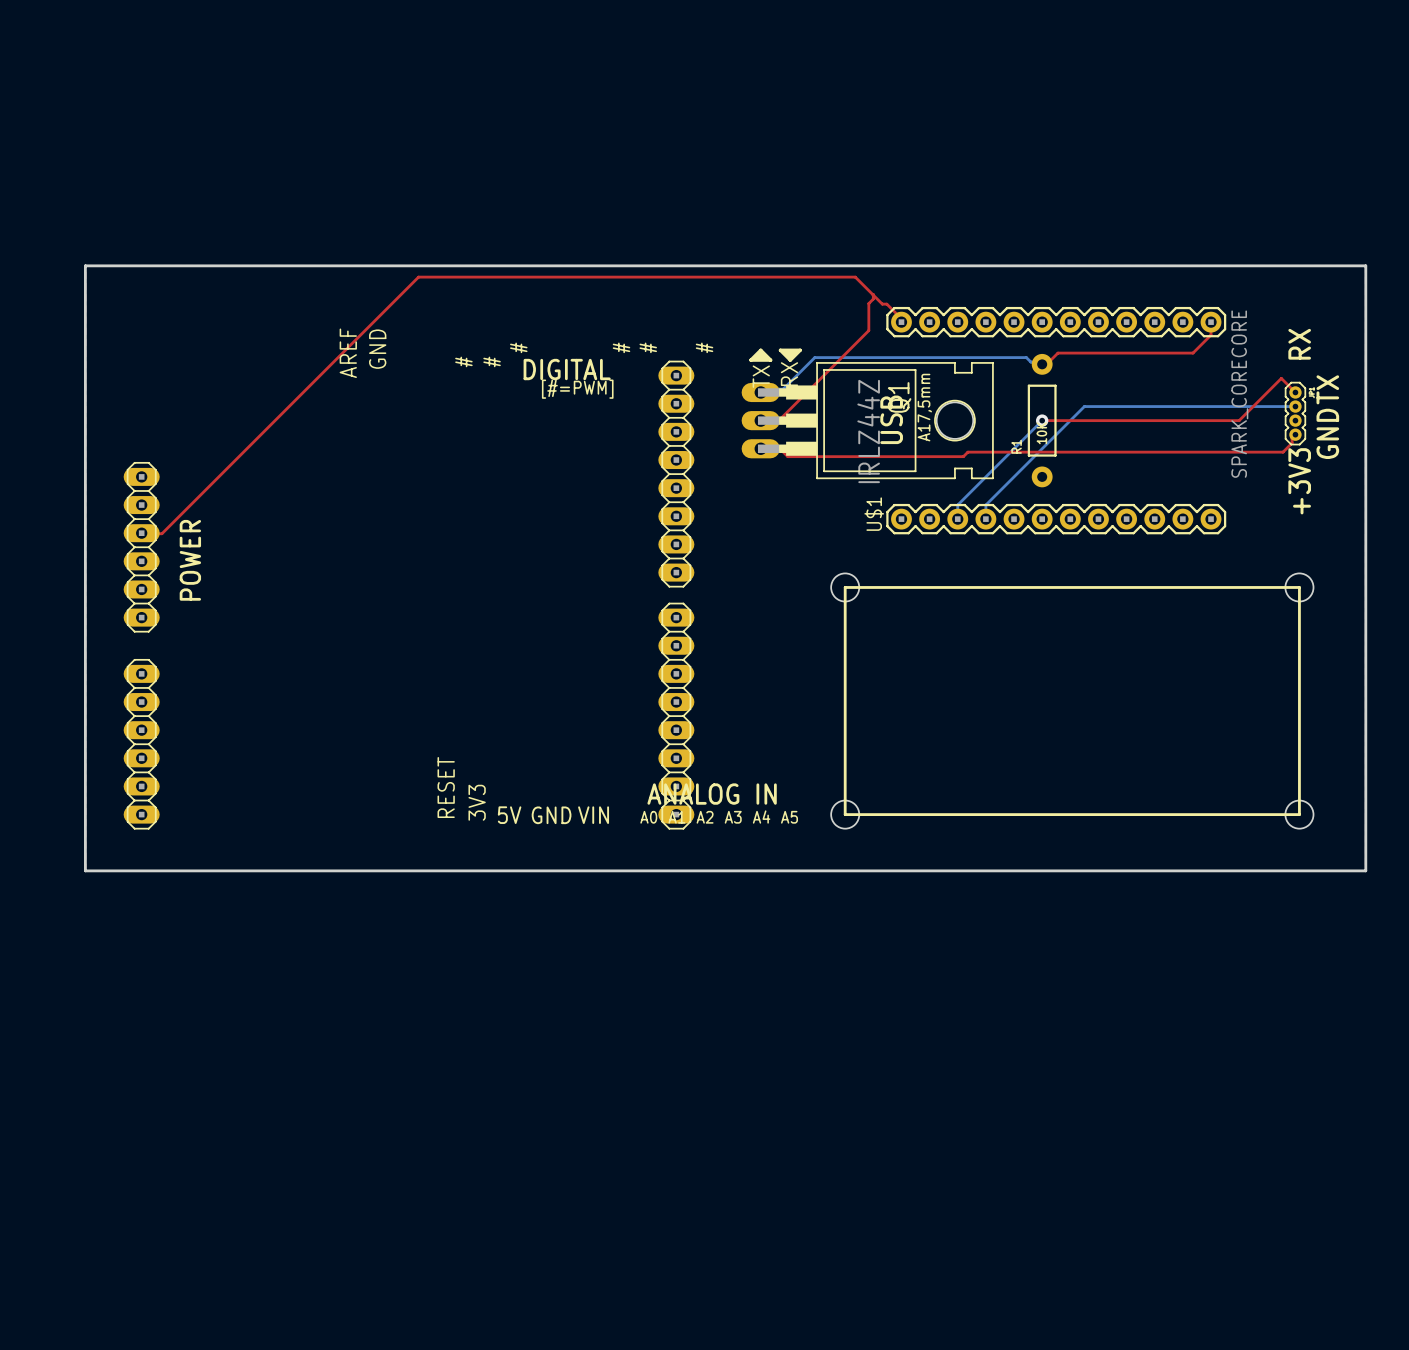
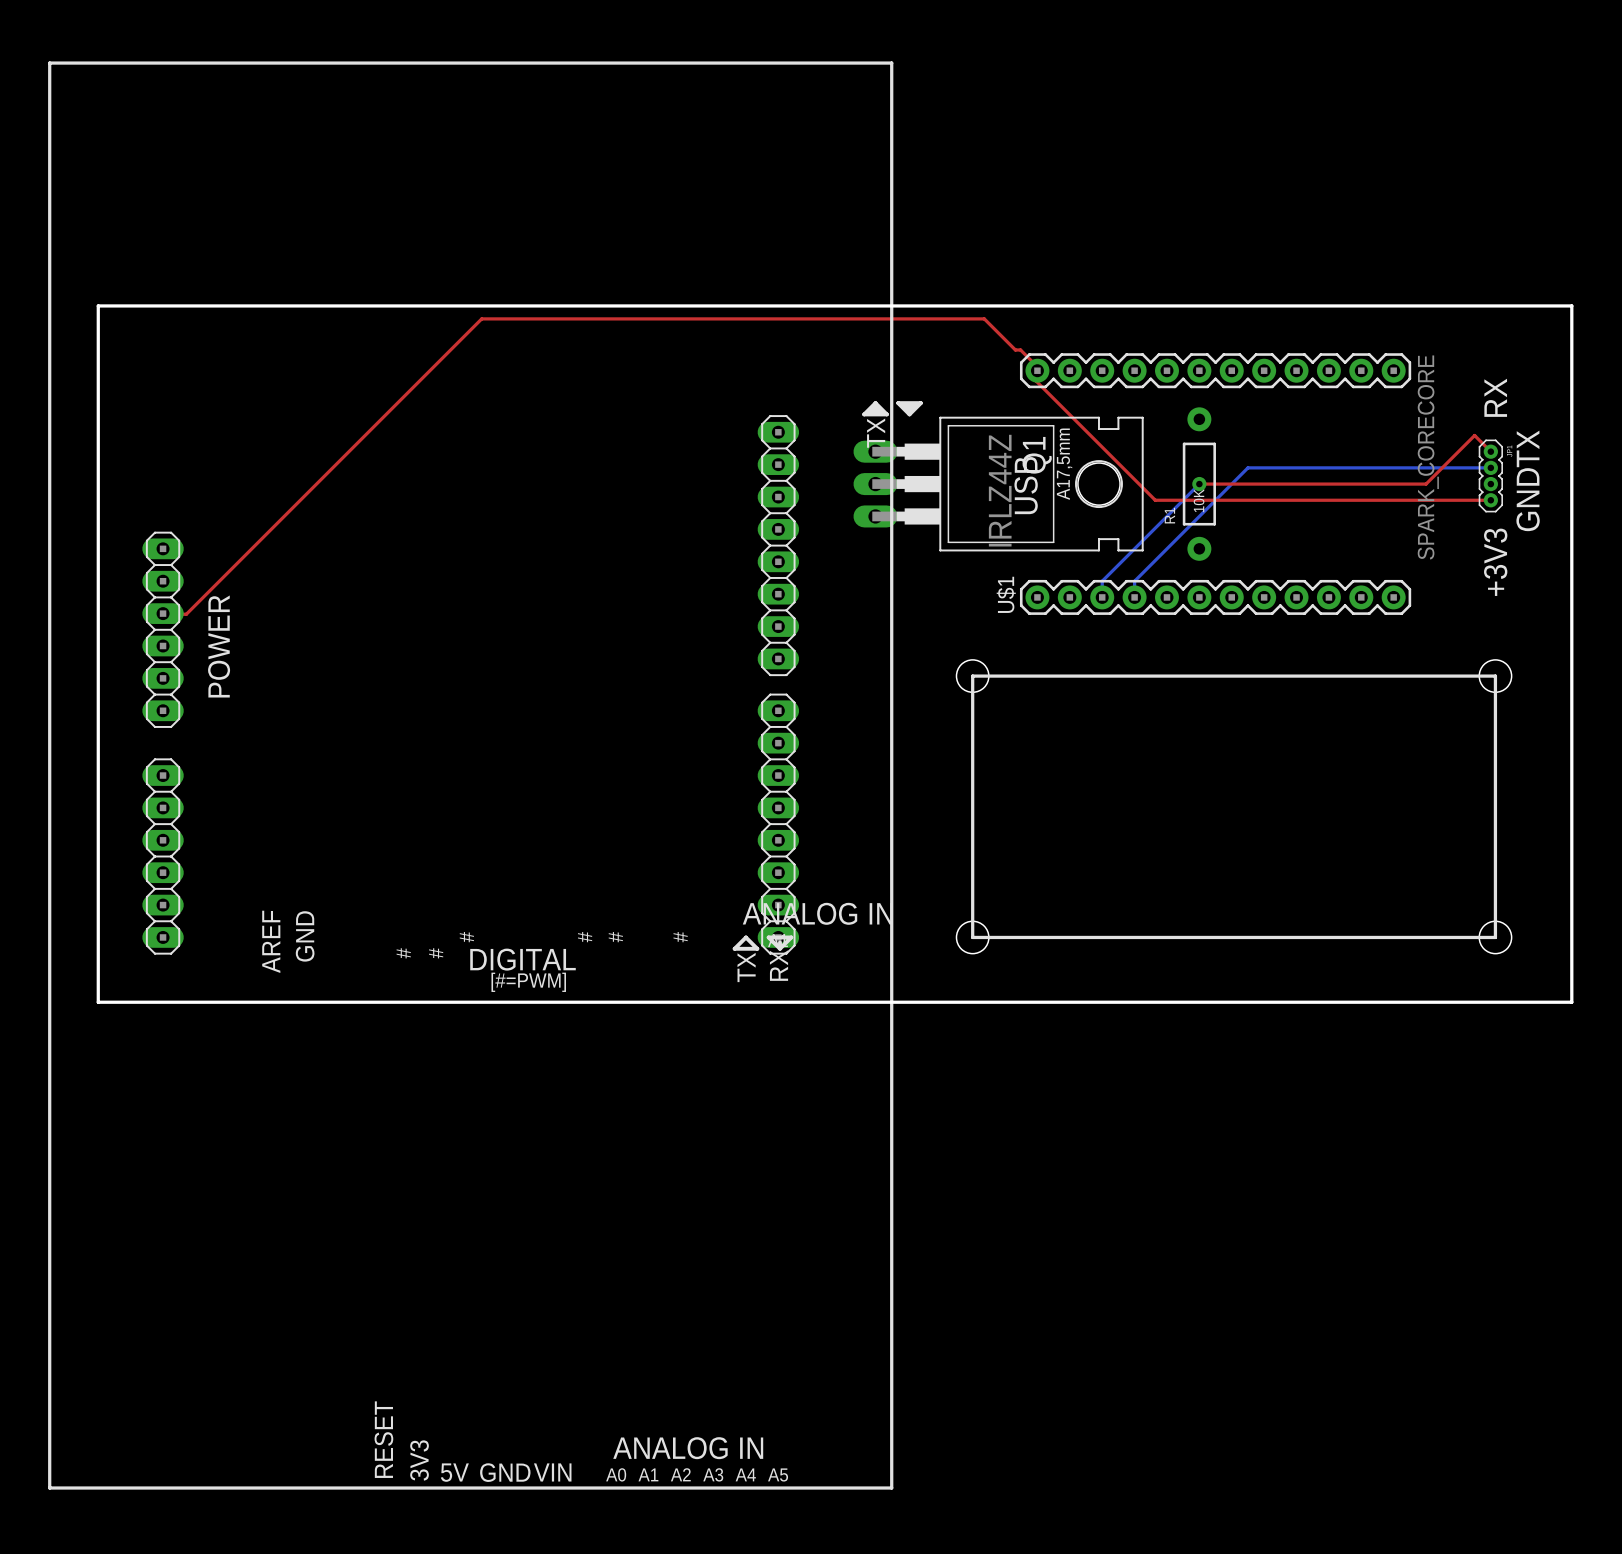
line: none -> (49, 63) (49, 1488) (891, 1488) (891, 63) (49, 63)
top track: (873, 294) (873, 299) (868, 303) (868, 330) (778, 420) (760, 420) -> none
top track: (1211, 322) (1211, 335) (1193, 353) (1057, 353) (1044, 366) (1042, 364) -> none
text: # (518, 347) -> none
text: # (621, 347) -> none
text: # (648, 347) -> none
text: # (704, 347) -> none
text: GND (377, 349) -> none
text: AREF (348, 353) -> none
text: # (463, 361) -> none
text: # (492, 361) -> none
bottom track: (1042, 364) (1039, 362) (1030, 362) (1026, 357) (814, 357) (783, 389) (760, 389) (760, 392) -> none
text: DIGITAL (567, 369) -> none
text: RX (789, 374) -> none
text: [#=PWM] (577, 389) -> none
top track: (1295, 434) (1292, 438) (1292, 443) (1283, 452) (967, 452) (963, 456) (787, 456) (778, 447) (760, 448) -> (1490, 500) (1155, 500) (1036, 381) (1037, 370)
text: RESET (446, 787) -> none
text: 3V3 (477, 802) -> none
text: none -> # (466, 937)
text: none -> # (585, 937)
text: none -> # (615, 937)
text: none -> # (680, 937)
text: none -> GND (305, 936)
line: none -> (745, 937) (757, 948) (734, 948) (745, 937)
line: none -> (768, 937) (791, 937) (779, 948) (768, 937)
text: 5V (509, 815) -> none
text: GND (551, 815) -> none
text: VIN (593, 815) -> none
text: none -> AREF (271, 941)
text: A0 (648, 817) -> none
text: A2 (705, 817) -> none
text: A3 (733, 817) -> none
text: A4 (761, 817) -> none
text: A5 (789, 817) -> none
line: none -> (779, 942) (779, 943)
text: none -> # (403, 953)
text: none -> # (436, 953)
text: none -> DIGITAL (523, 959)
text: none -> RX (779, 965)
text: none -> TX (746, 967)
text: none -> [#=PWM] (528, 982)
text: none -> RESET (383, 1439)
text: none -> ANALOG IN (688, 1448)
text: none -> 3V3 (419, 1460)
text: none -> 5V (454, 1472)
text: none -> GND (505, 1472)
text: none -> VIN (552, 1472)
text: none -> A0 (616, 1474)
text: none -> A1 (648, 1474)
text: none -> A2 (680, 1474)
text: none -> A3 (713, 1474)
text: none -> A4 (745, 1474)
text: none -> A5 (778, 1474)

